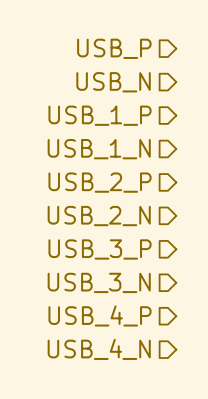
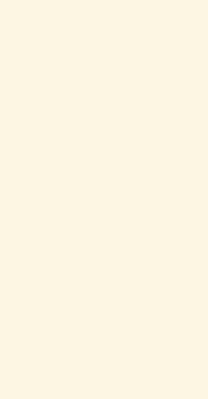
hierarchical label: USB_P (114, 48) -> none
hierarchical label: USB_N (113, 82) -> none
hierarchical label: USB_1_P (100, 115) -> none
hierarchical label: USB_1_N (99, 149) -> none
hierarchical label: USB_2_P (100, 182) -> none
hierarchical label: USB_2_N (99, 216) -> none
hierarchical label: USB_3_P (100, 249) -> none
hierarchical label: USB_3_N (99, 282) -> none
hierarchical label: USB_4_P (100, 315) -> none
hierarchical label: USB_4_N (99, 349) -> none

